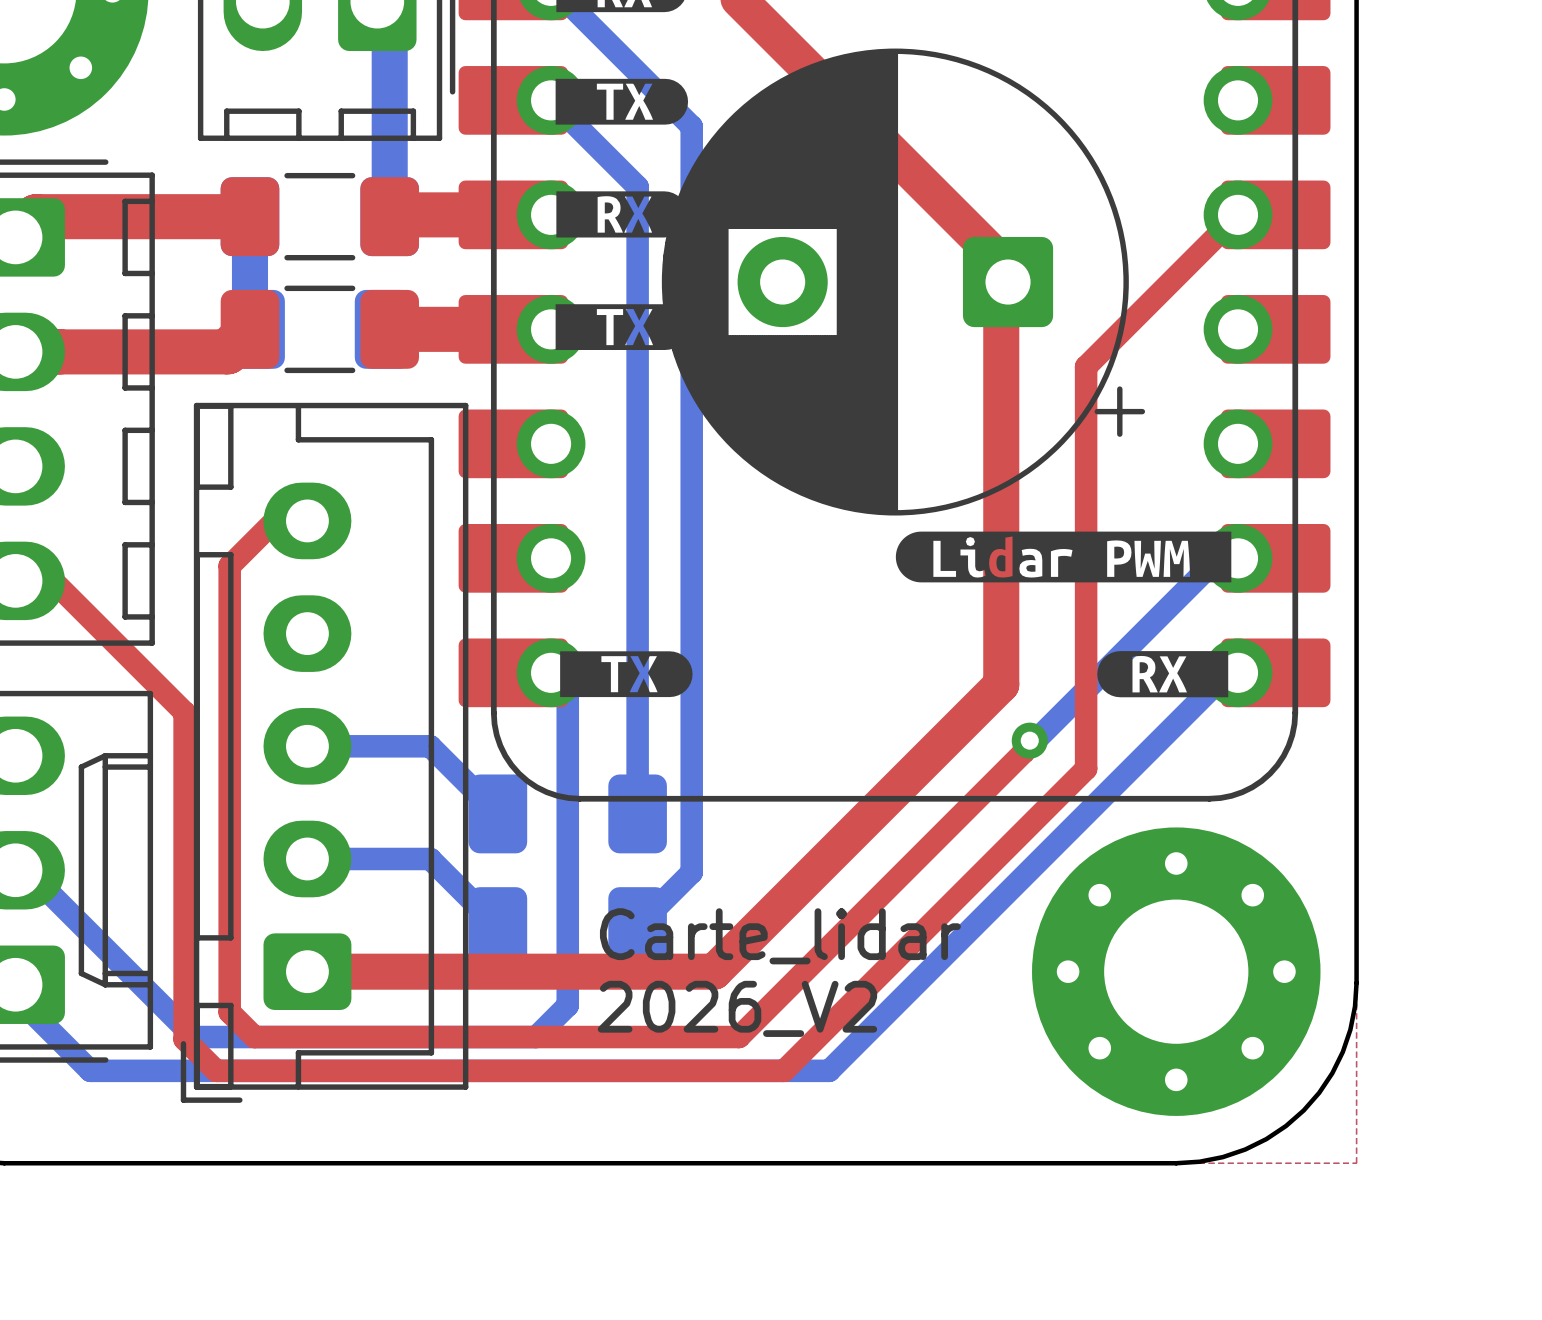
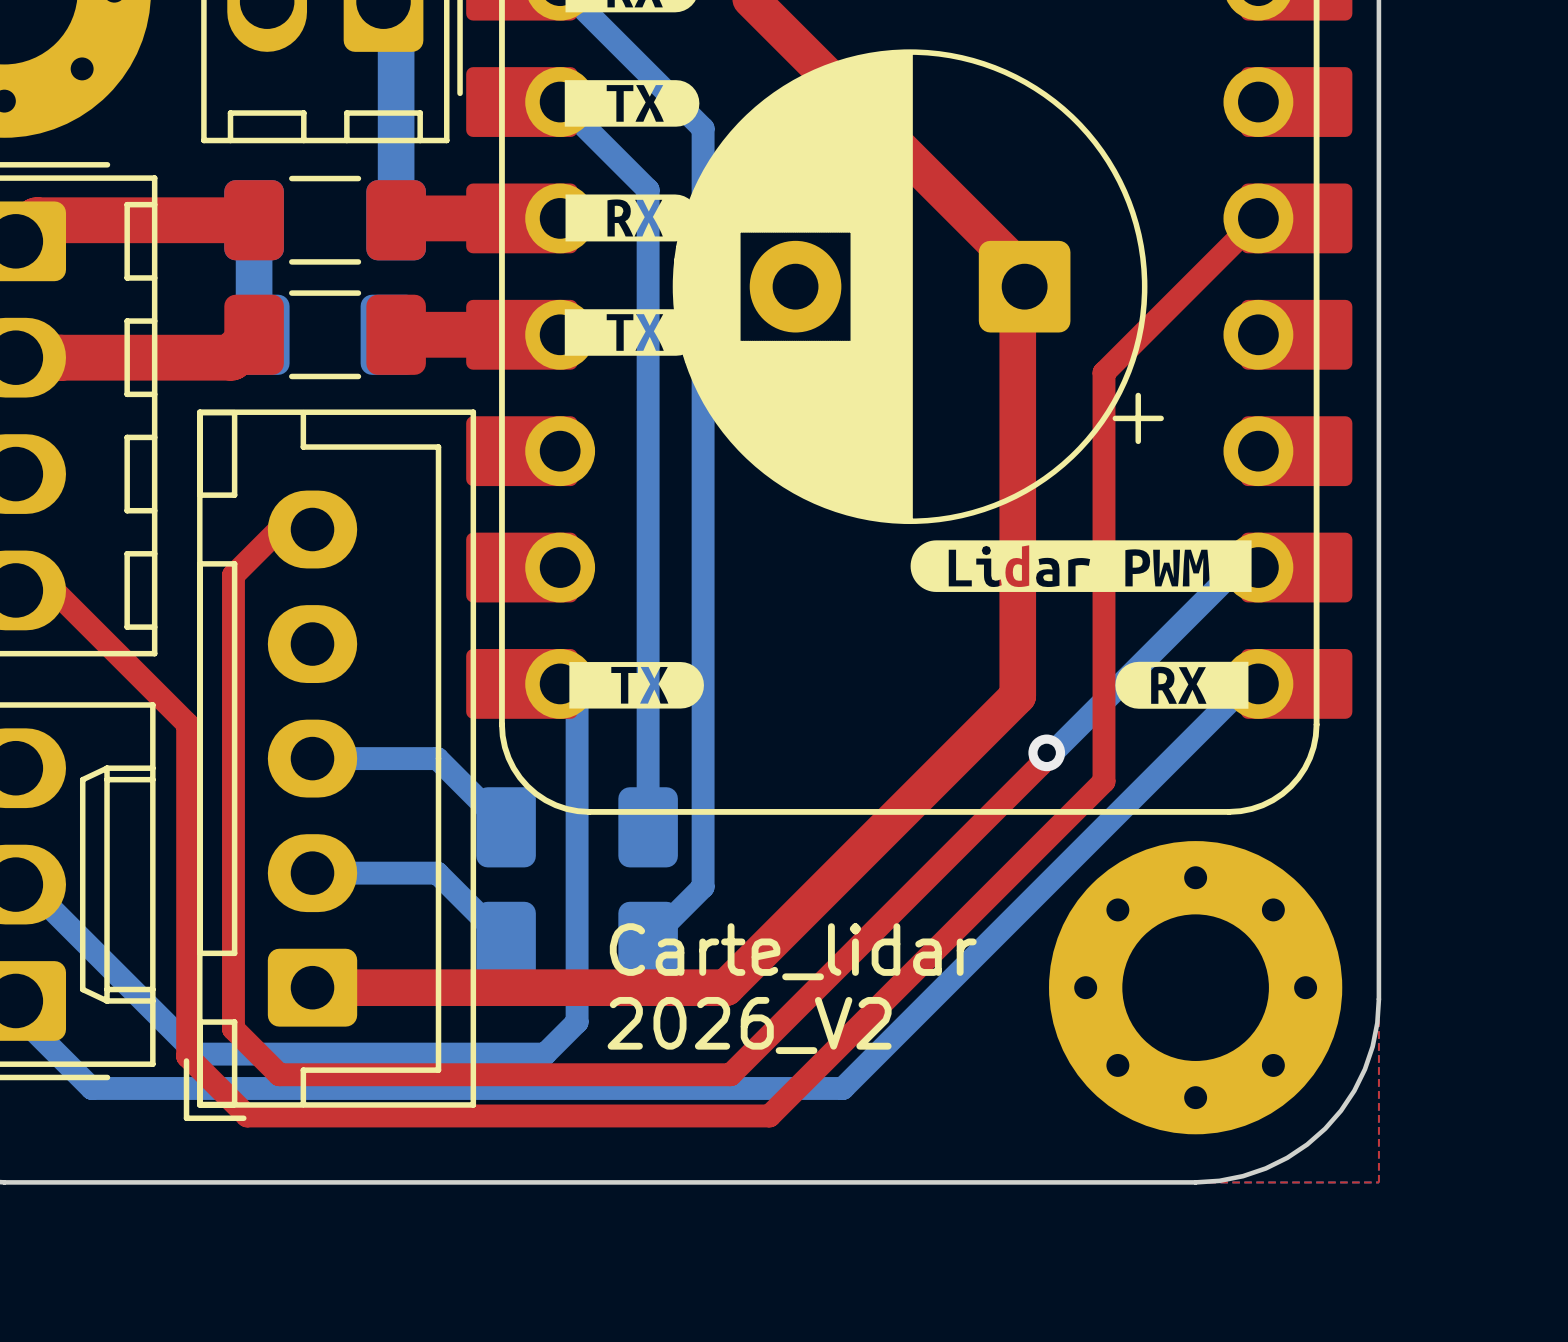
top track: (254, 1037) (739, 1037) -> (258, 1054) (279, 1074) (730, 1074) (751, 1054)
top track: (216, 1070) (784, 1070) -> (219, 1088) (247, 1115) (769, 1115) (797, 1088)

